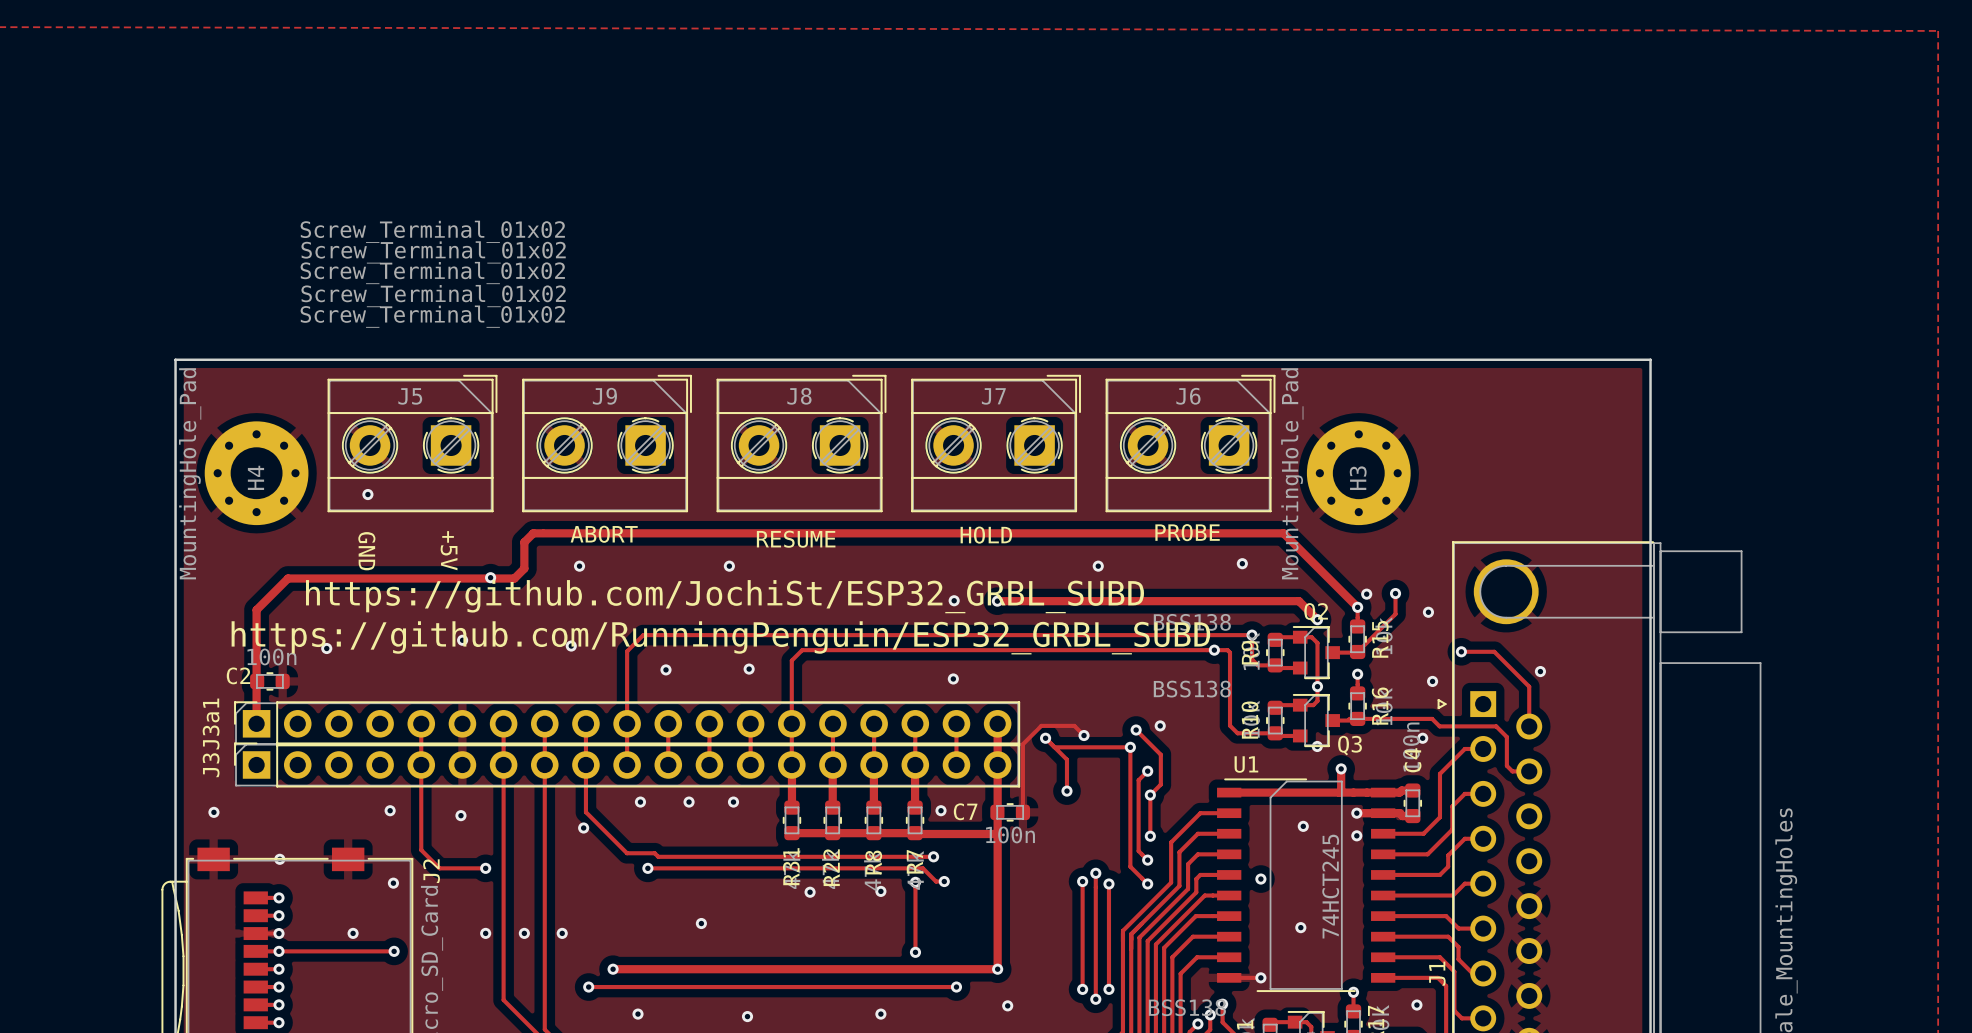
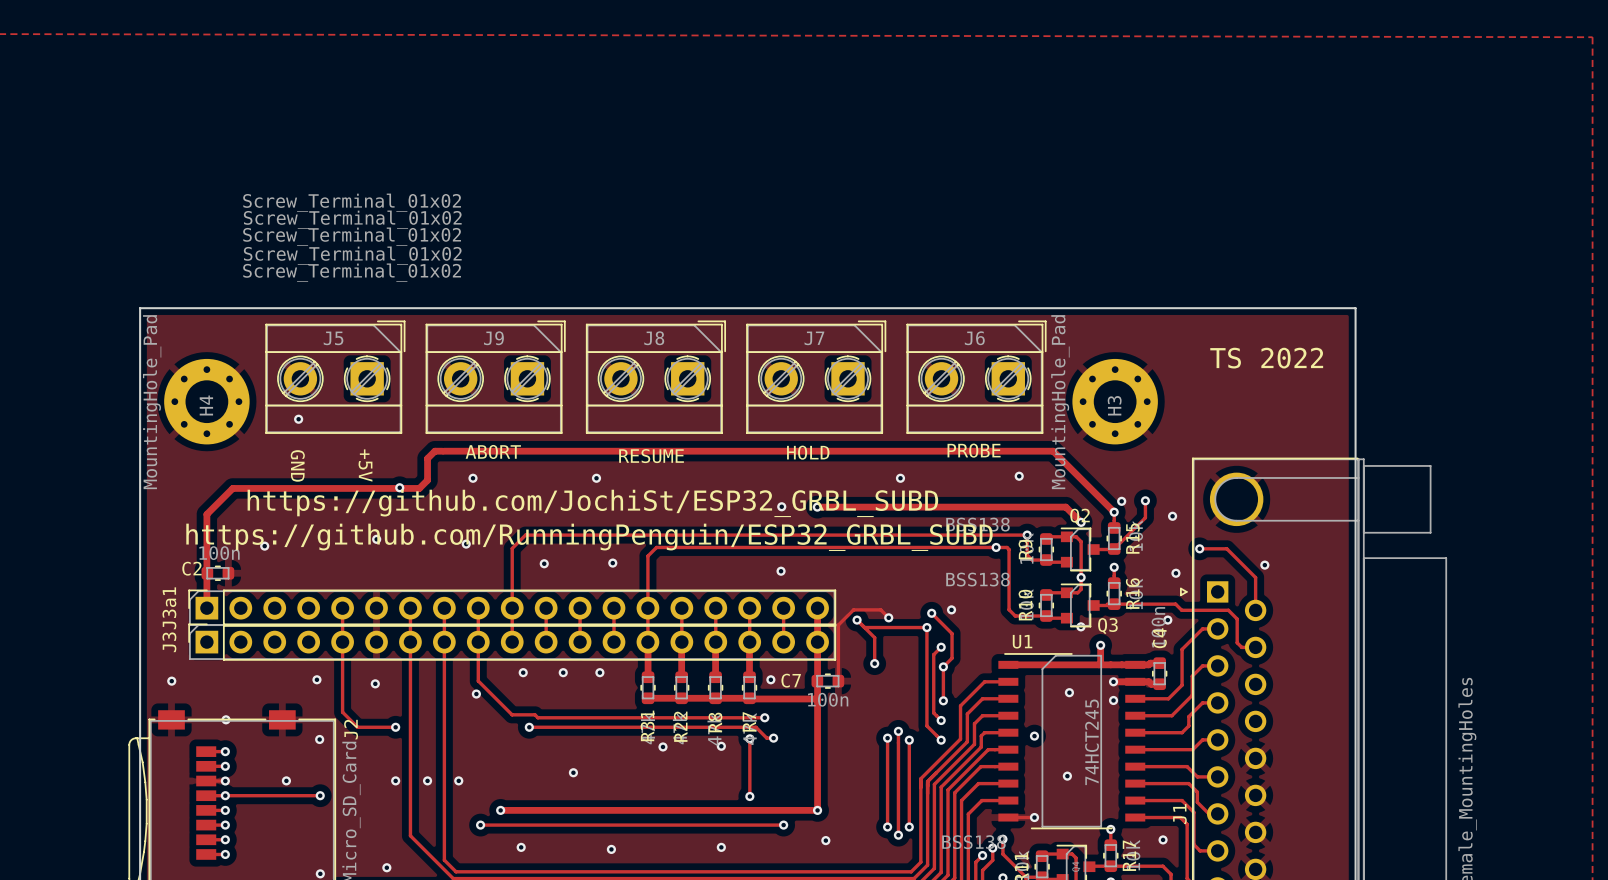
text: none -> TS 2022 (1266, 358)

